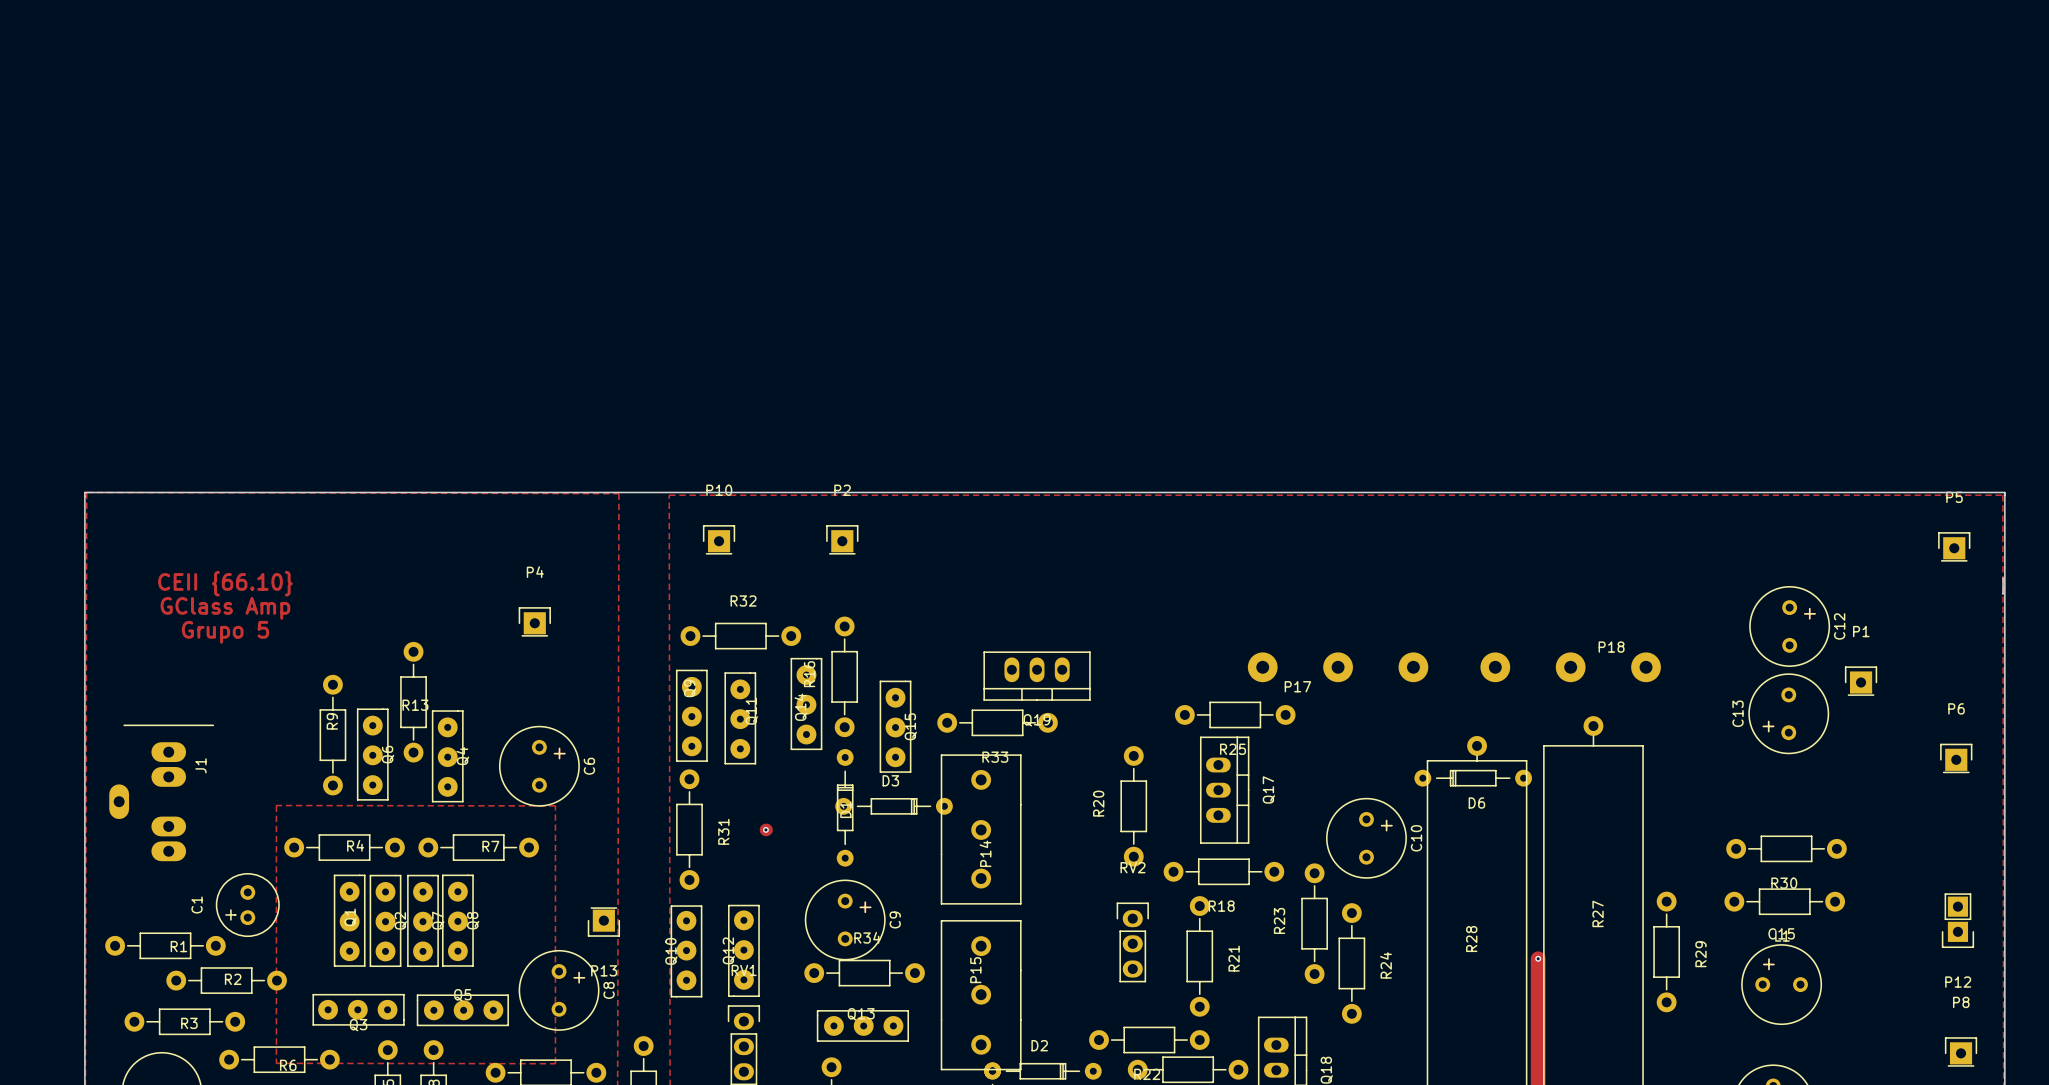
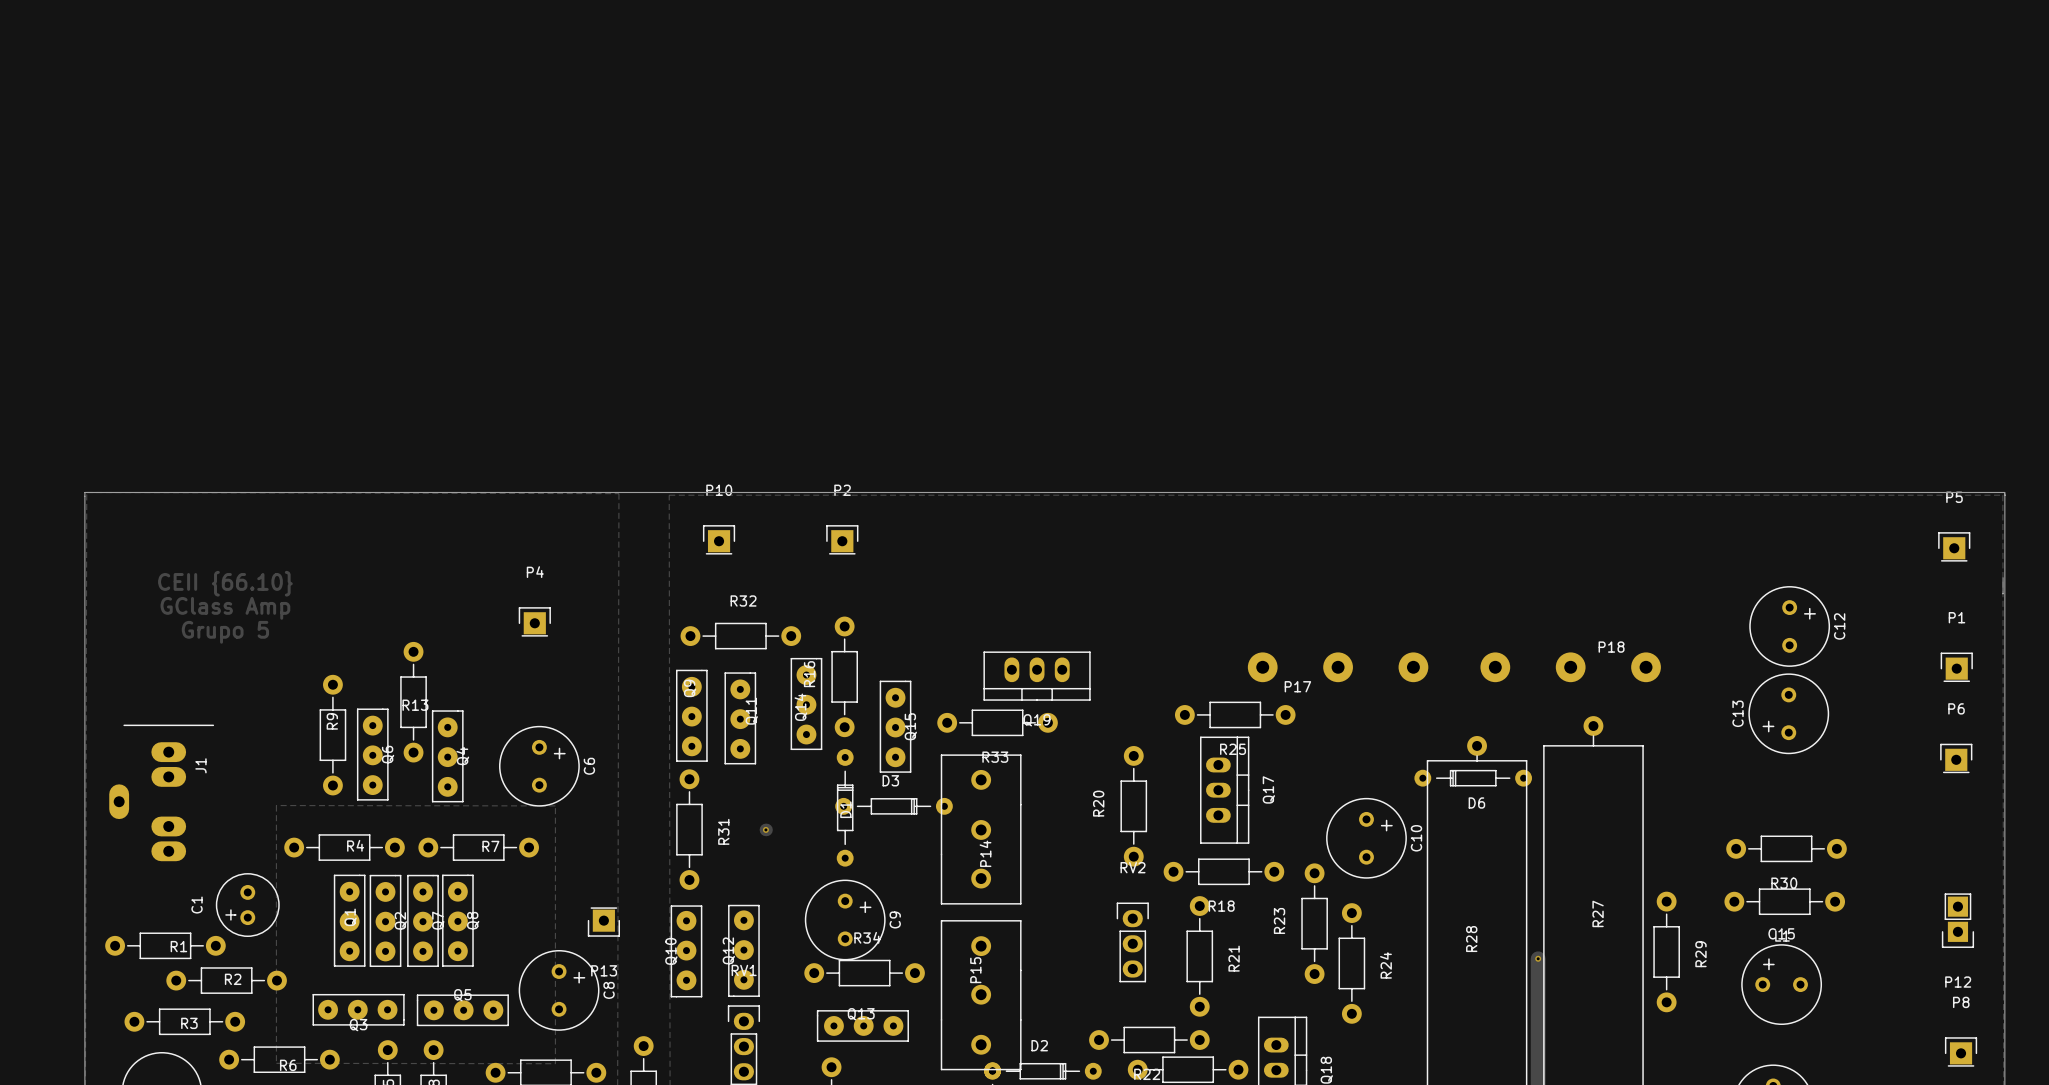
P1 position: (1861, 681) -> (1956, 667)

